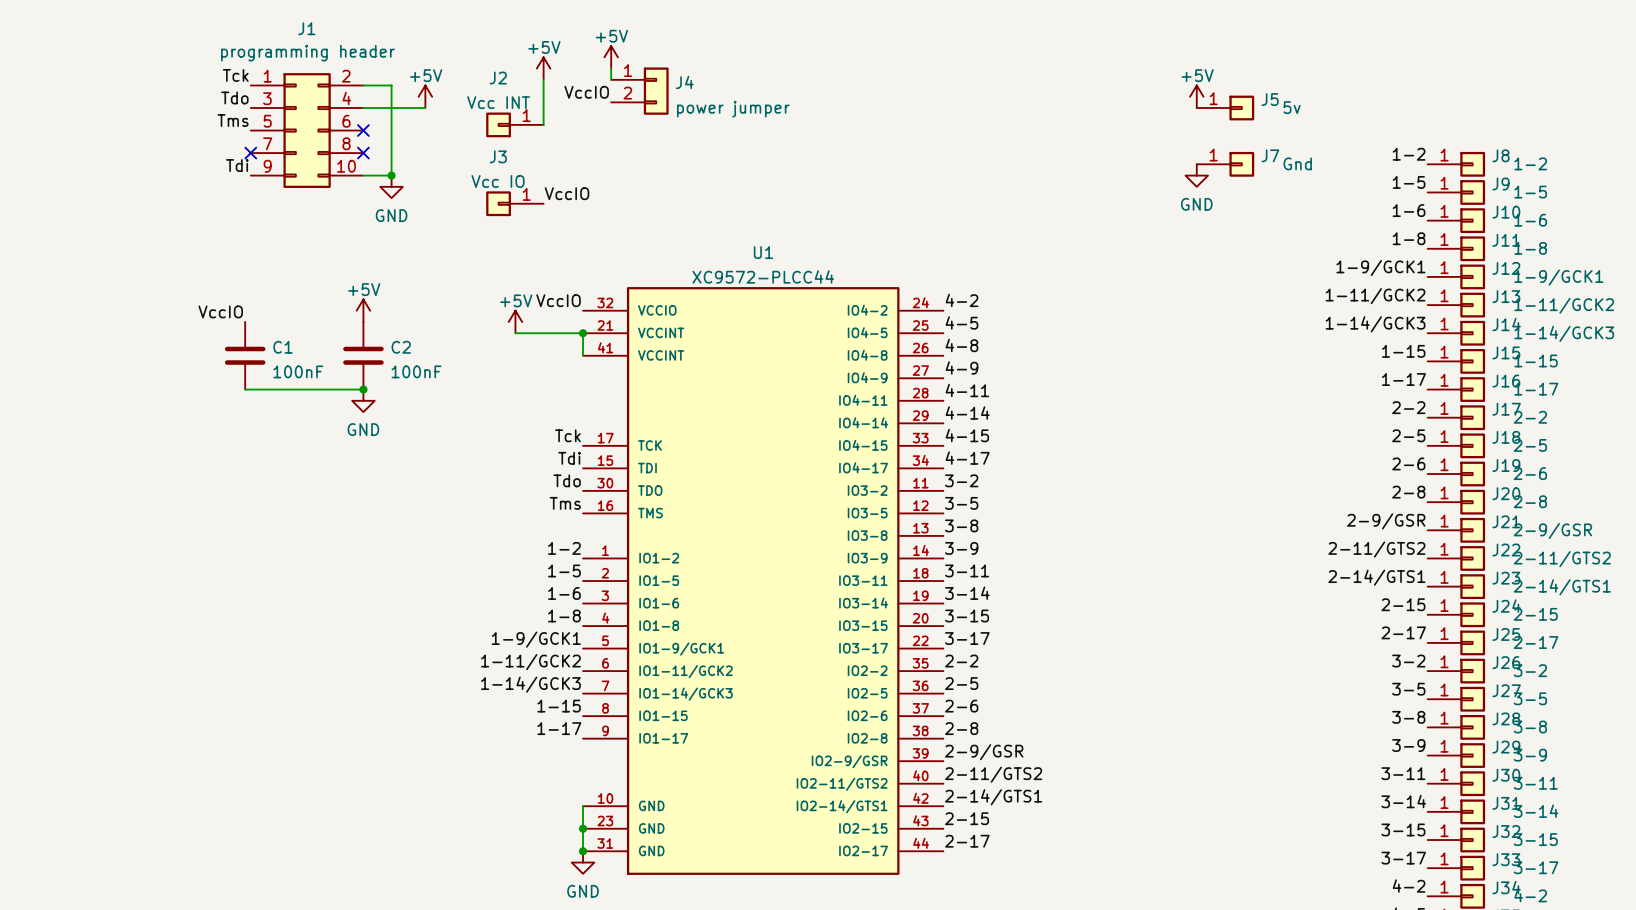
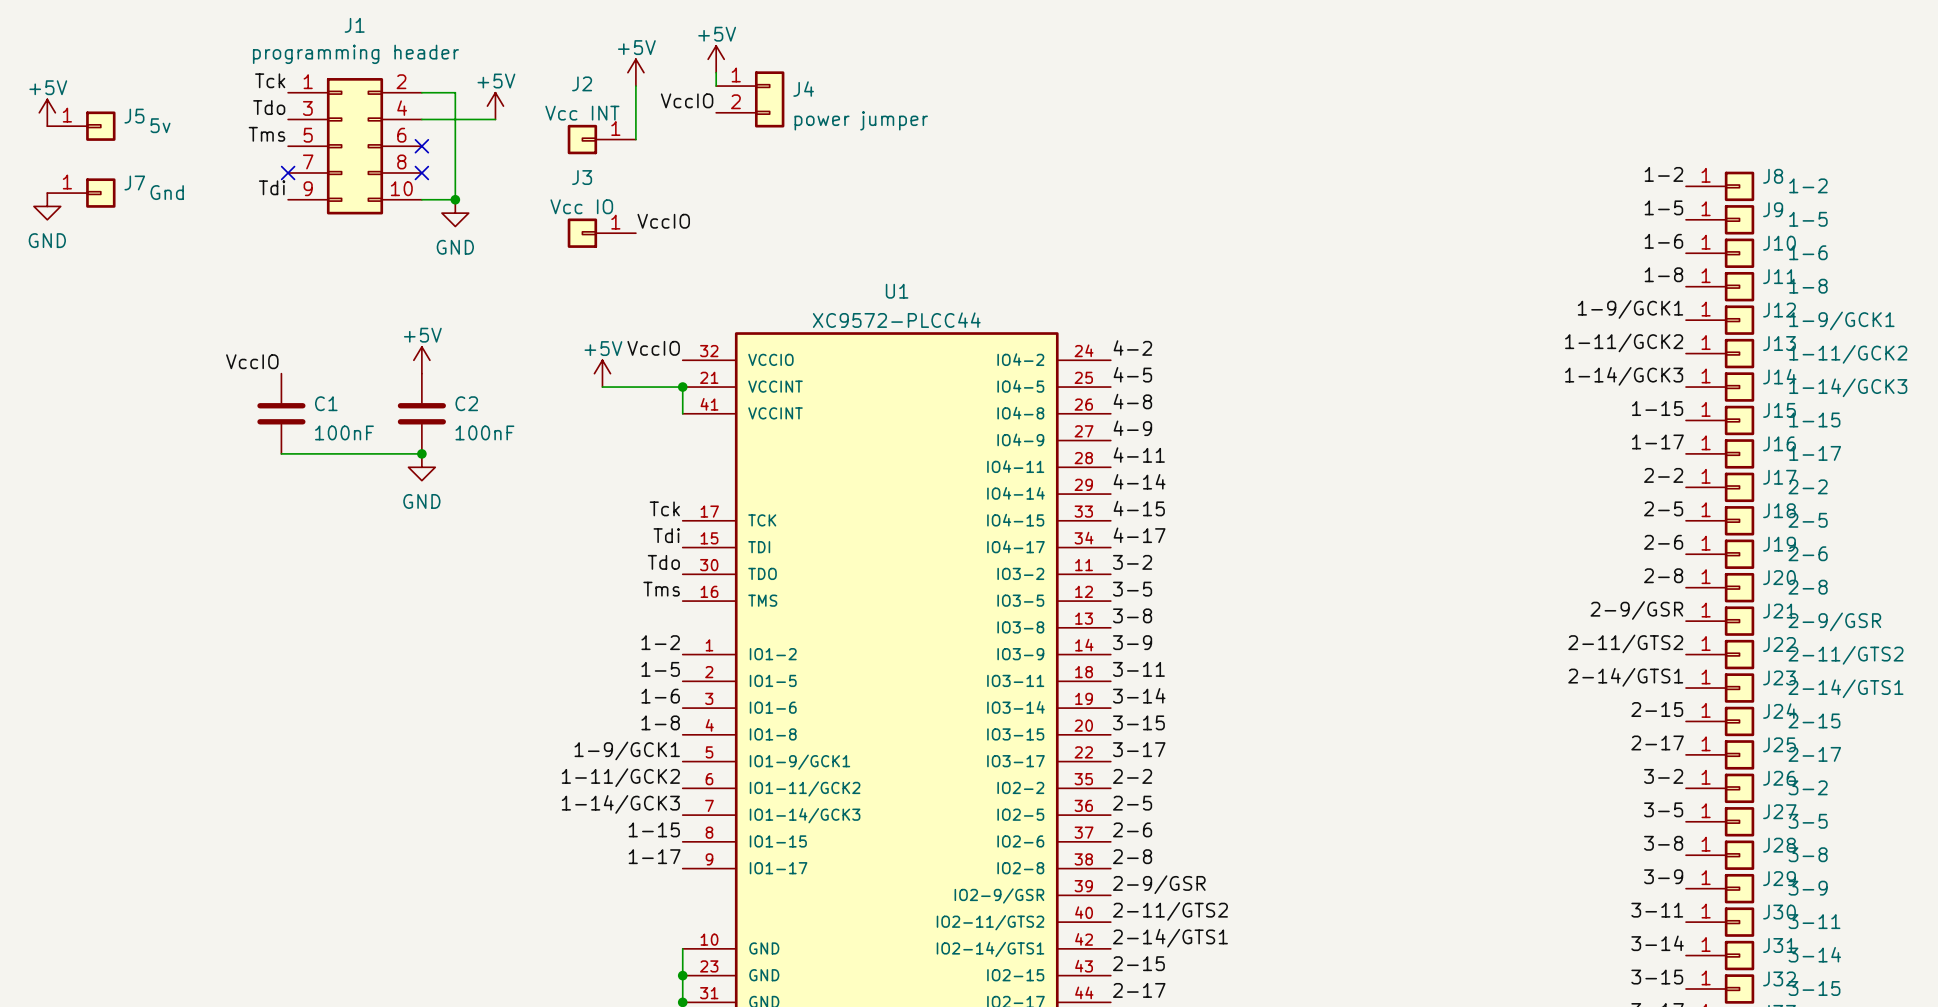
power symbol: +5V (1196, 96) -> none
power symbol: none -> +5V (47, 112)
J5 position: (1225, 108) -> (81, 126)
J7 position: (1225, 164) -> (81, 193)
power symbol: GND (1196, 175) -> none
power symbol: none -> GND (47, 206)

